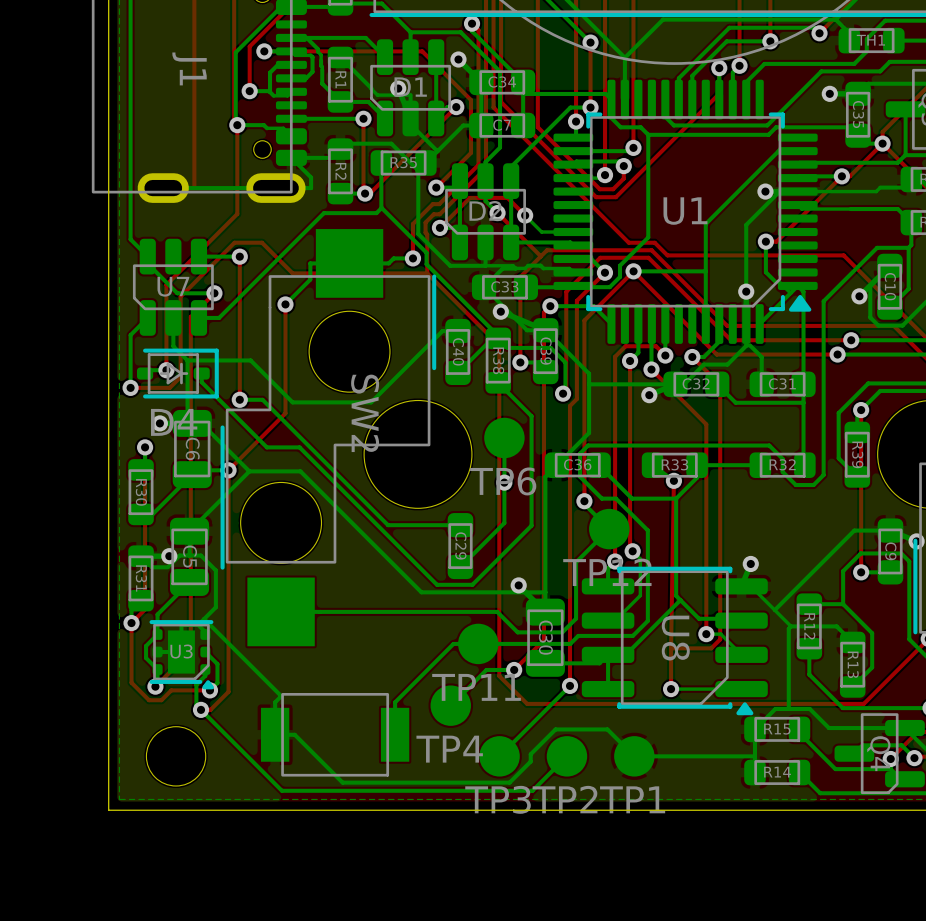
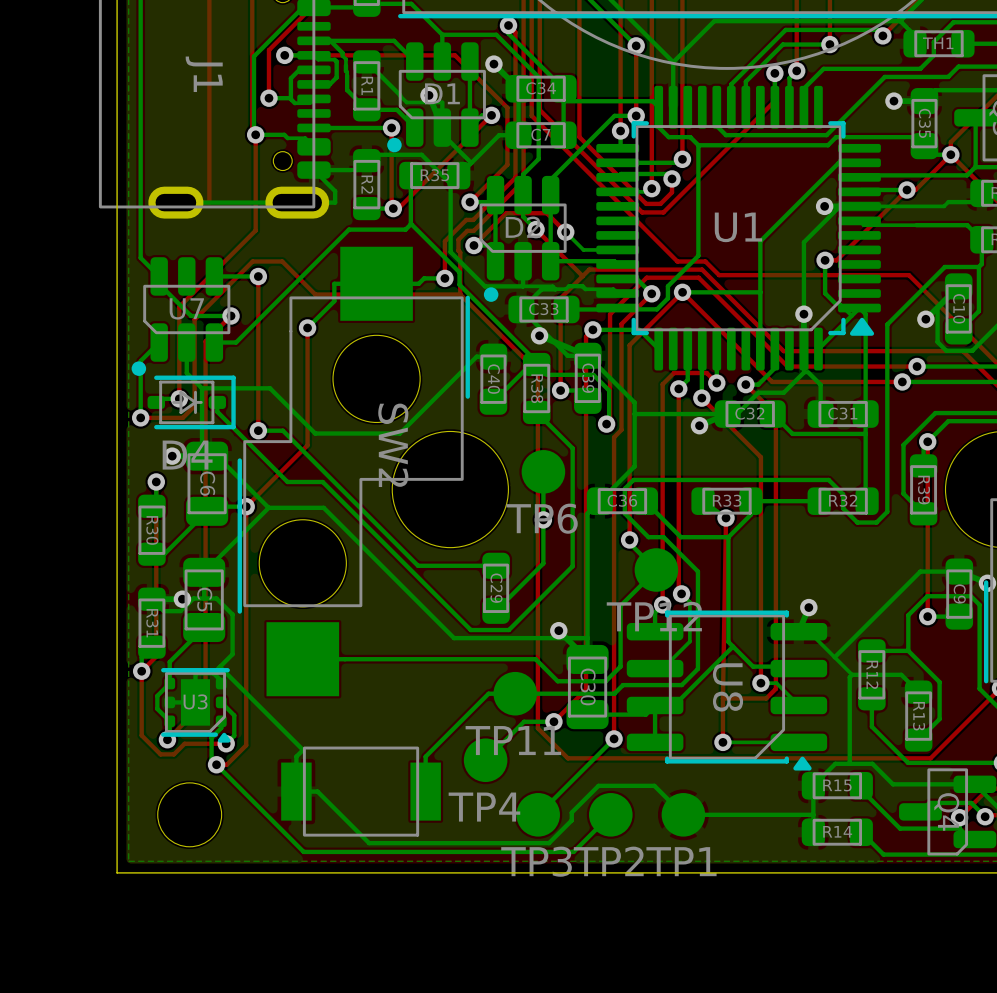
drawing: none -> [387, 137, 402, 153]
drawing: none -> [483, 287, 499, 302]
drawing: none -> [131, 361, 147, 376]

